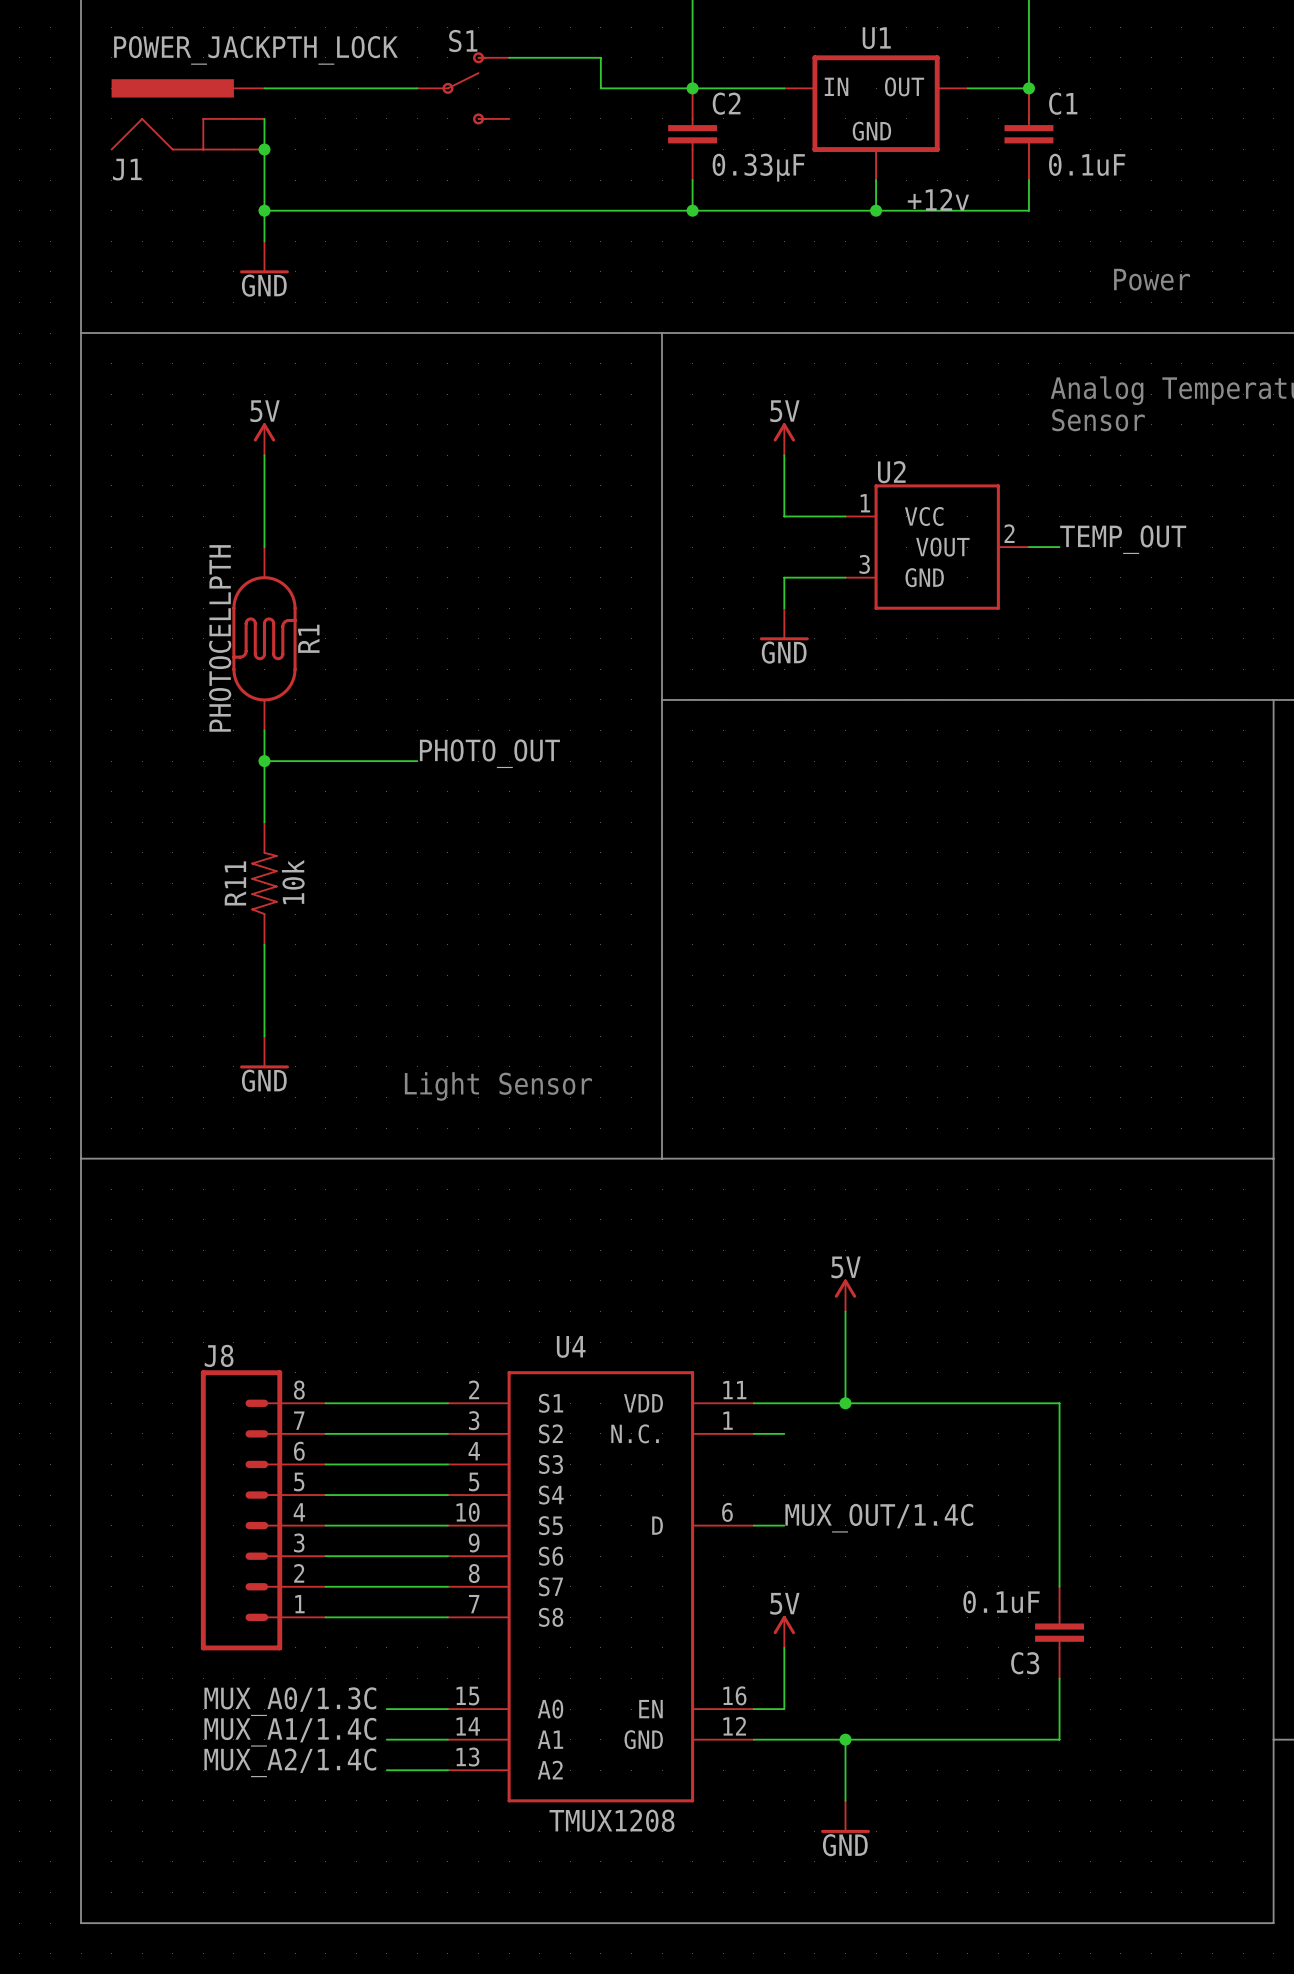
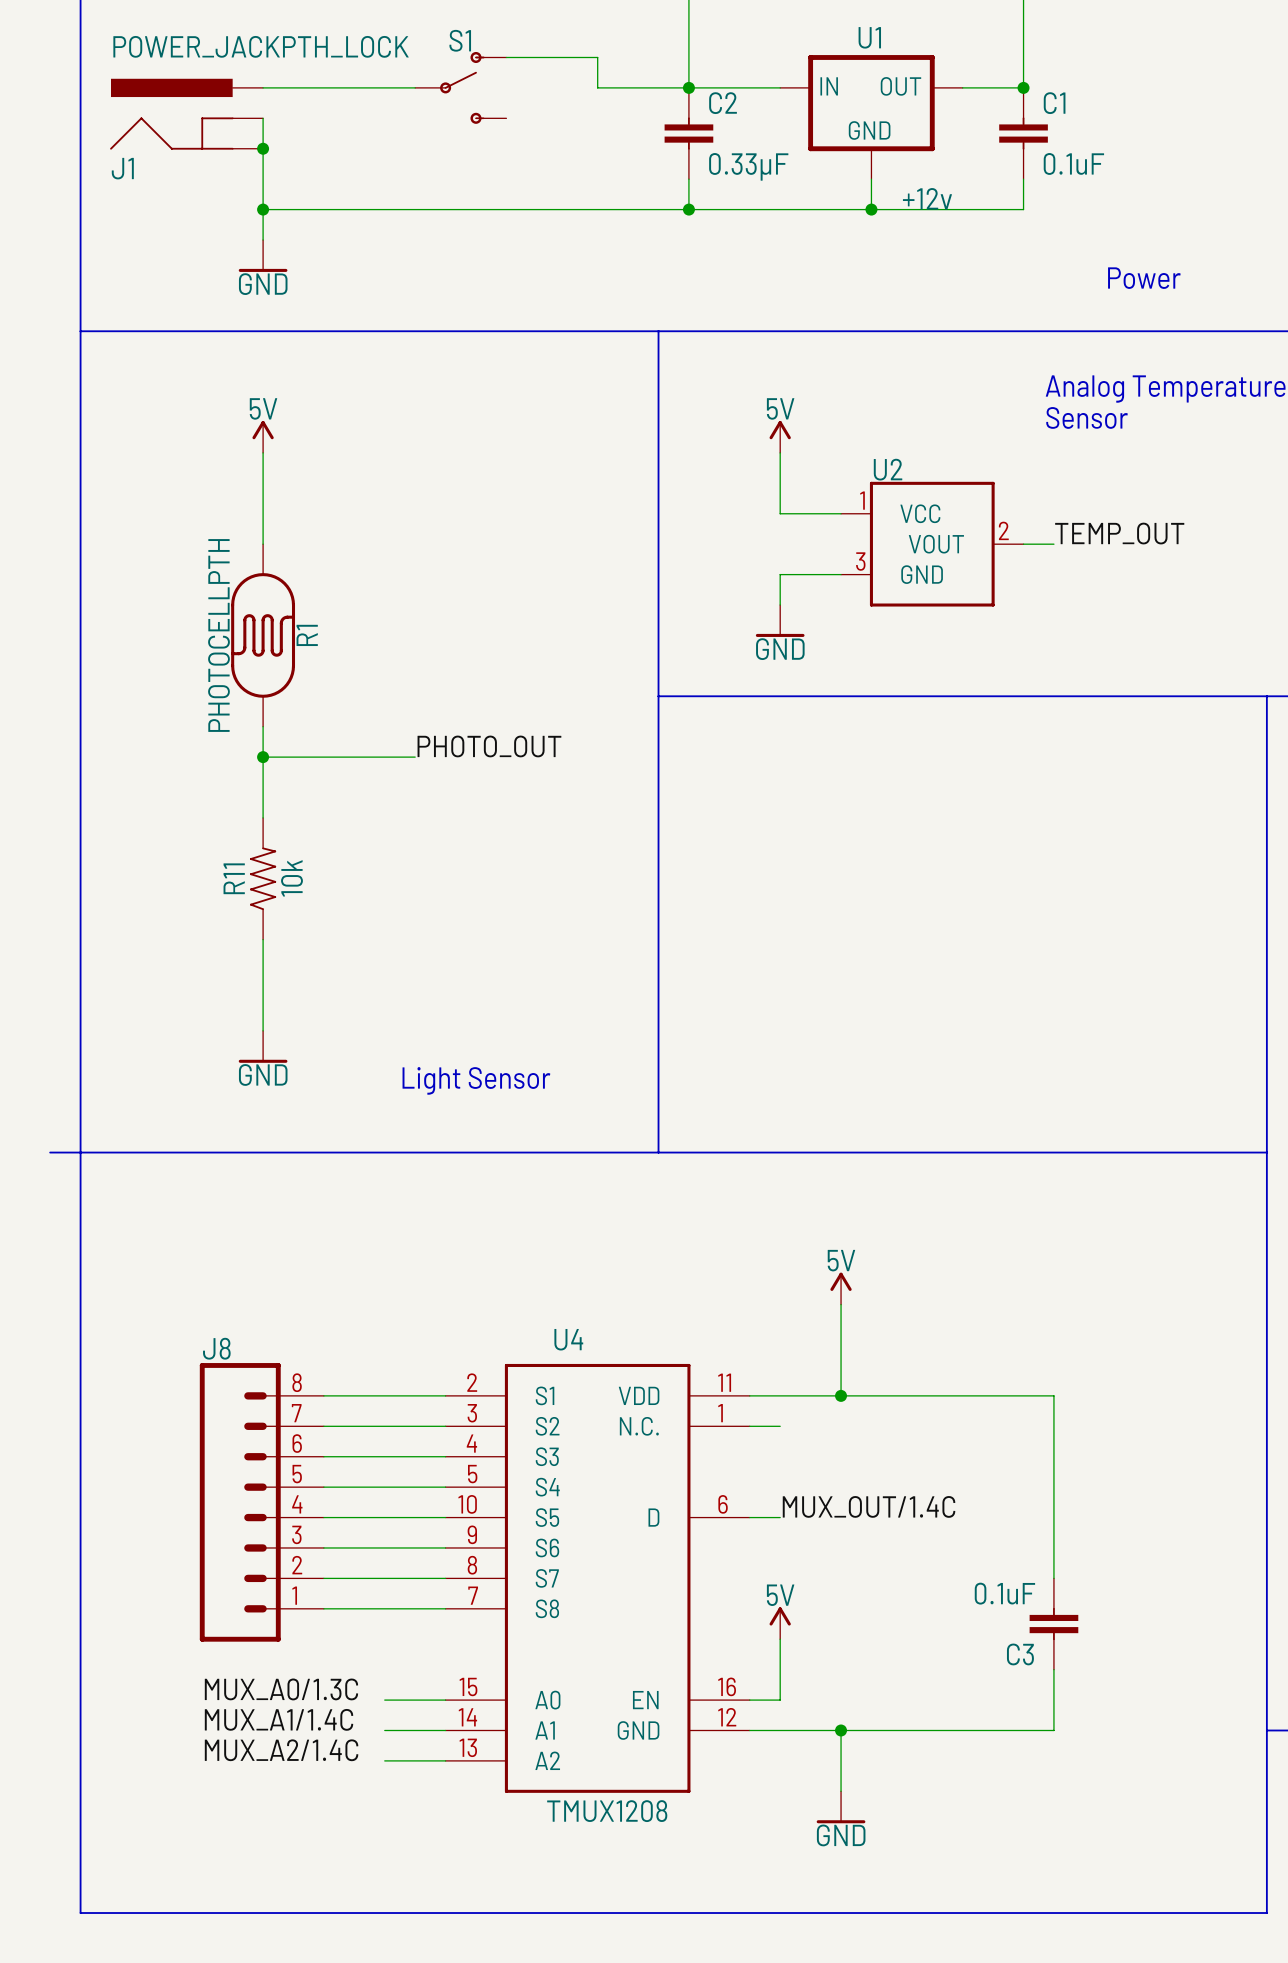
line: none -> (50, 1152) (80, 1152)

